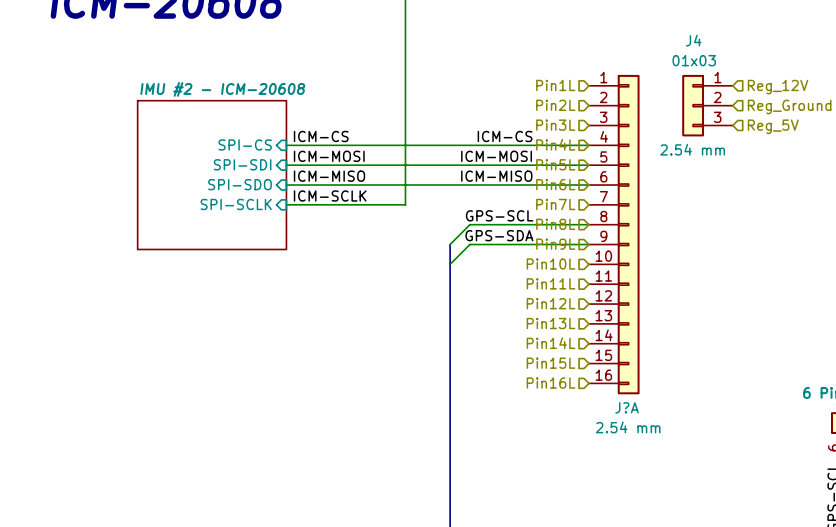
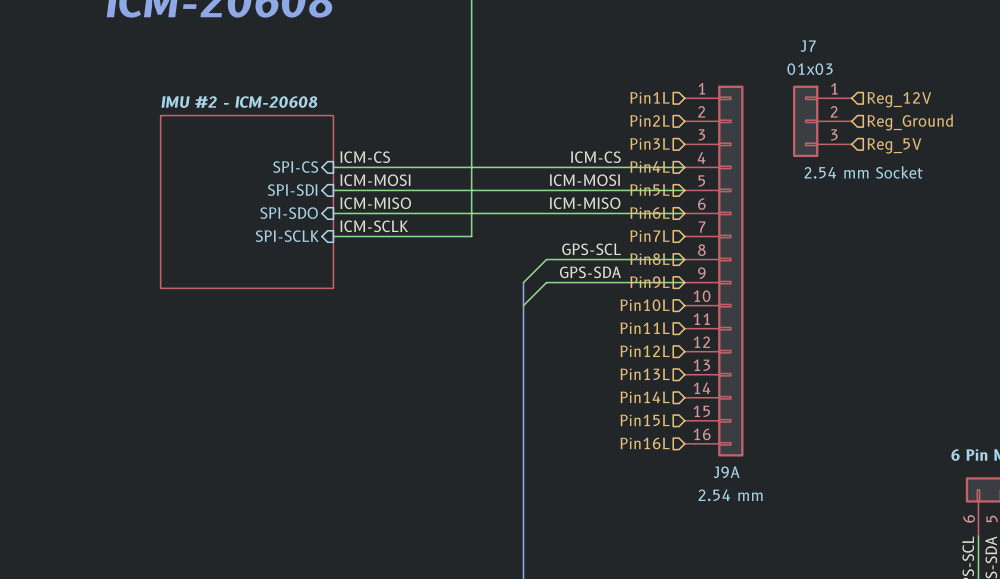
J4 name: J4 (693, 40) -> J7 (808, 46)
J4 text: 2.54 mm (692, 149) -> 2.54 mm Socket (863, 172)
J?A name: J?A (627, 407) -> J9A (726, 472)

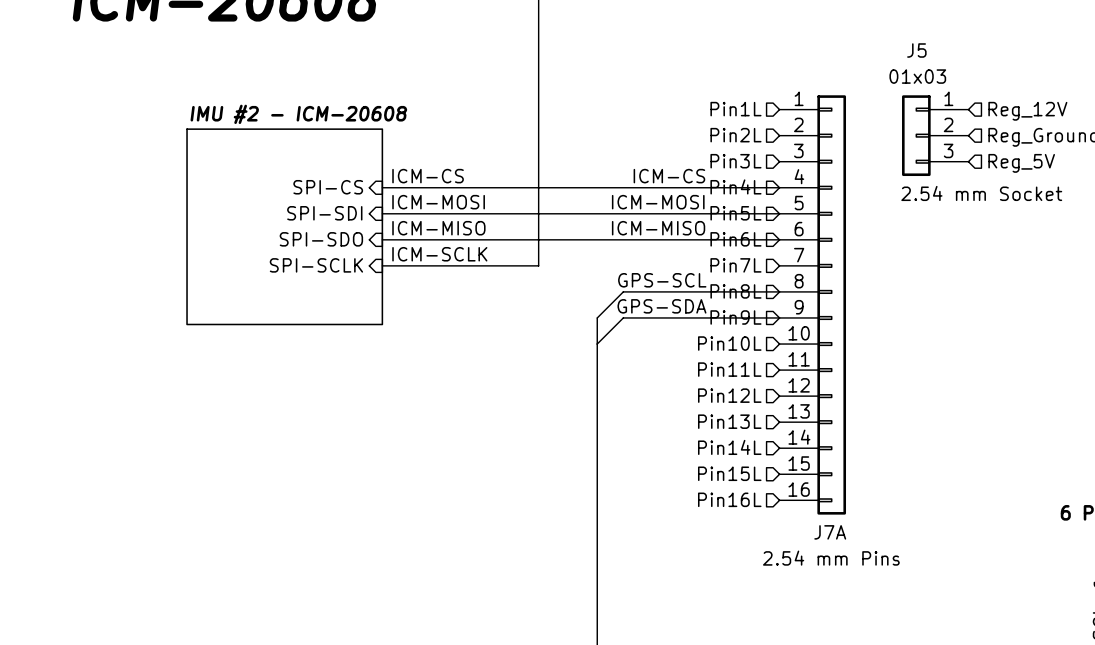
J7 name: J7 (808, 46) -> J5 (916, 50)
J9A name: J9A (726, 472) -> J7A (830, 532)
J9A text: 2.54 mm (730, 495) -> 2.54 mm Pins (831, 558)

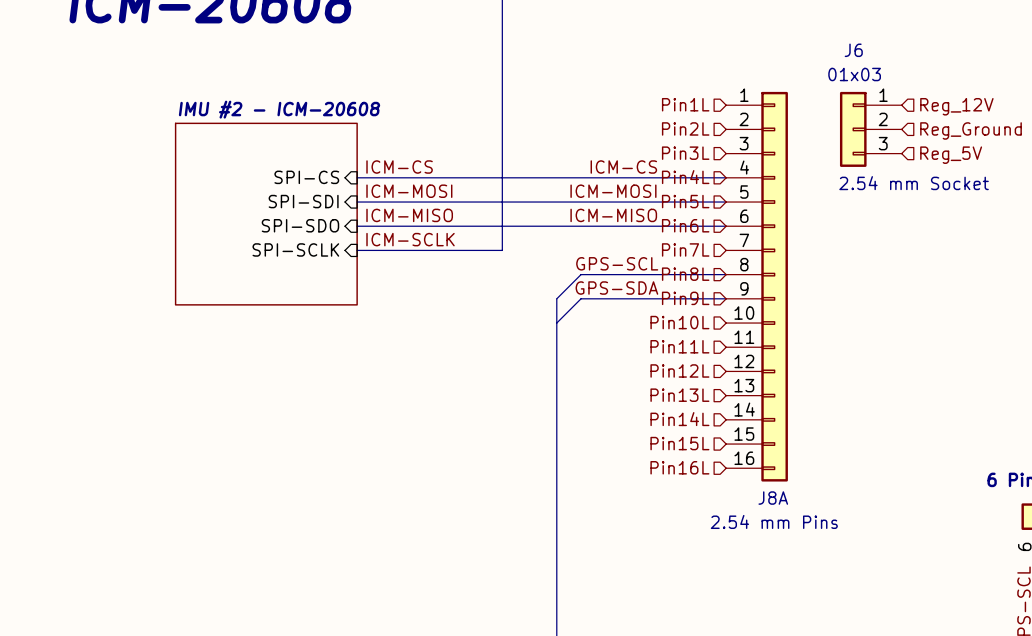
J5 name: J5 (916, 50) -> J6 (853, 50)
J7A name: J7A (830, 532) -> J8A (773, 498)

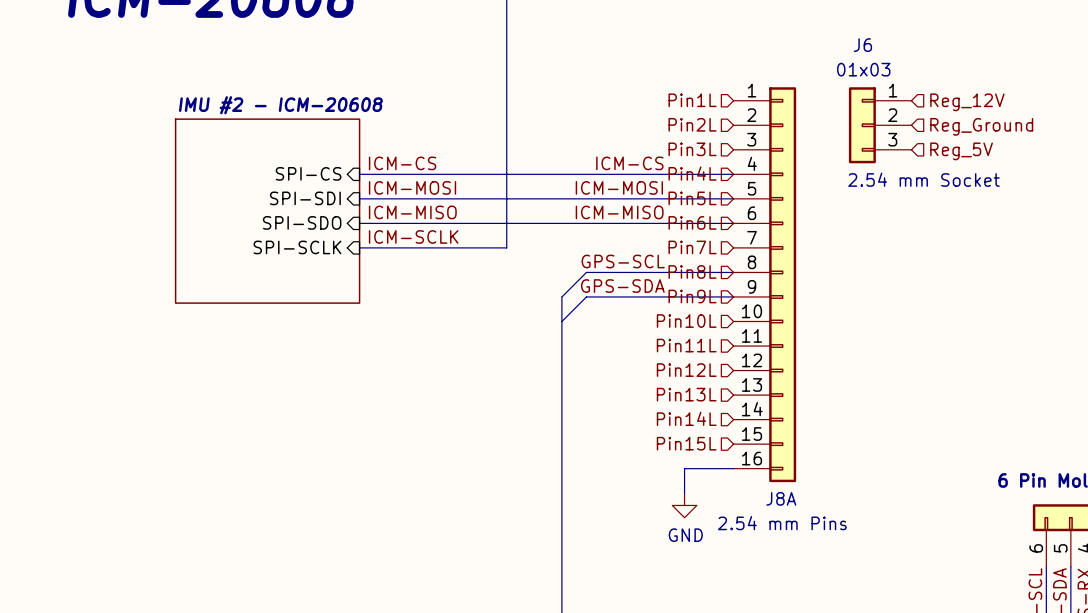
hierarchical label: Pin16L (679, 467) -> none
wire: none -> (733, 468) (684, 468) (684, 493)
power symbol: none -> GND (684, 505)

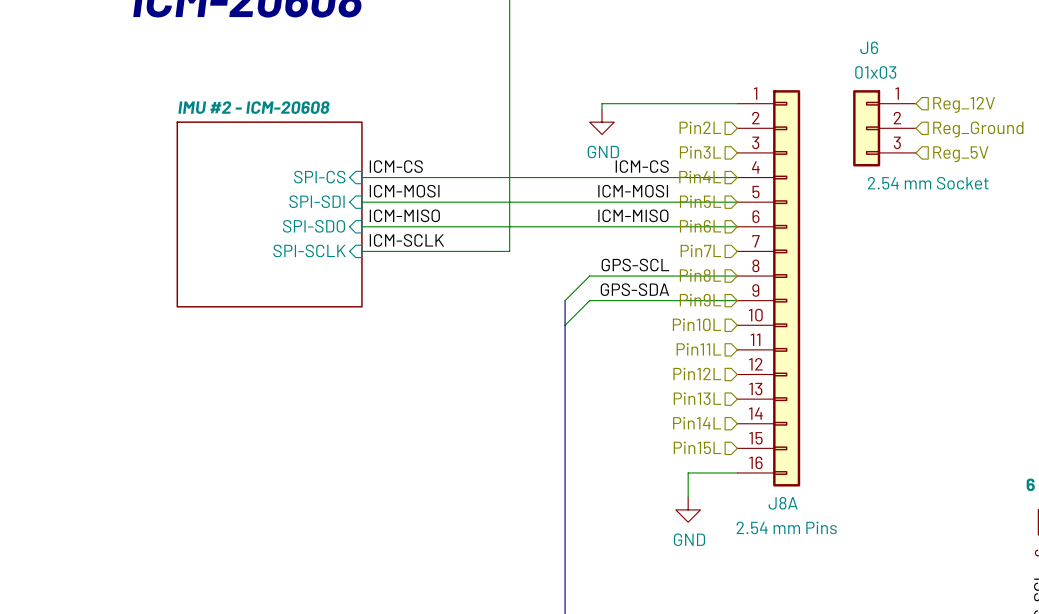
hierarchical label: Pin1L (692, 100) -> none
wire: none -> (737, 103) (601, 103) (601, 109)
power symbol: none -> GND (601, 122)

